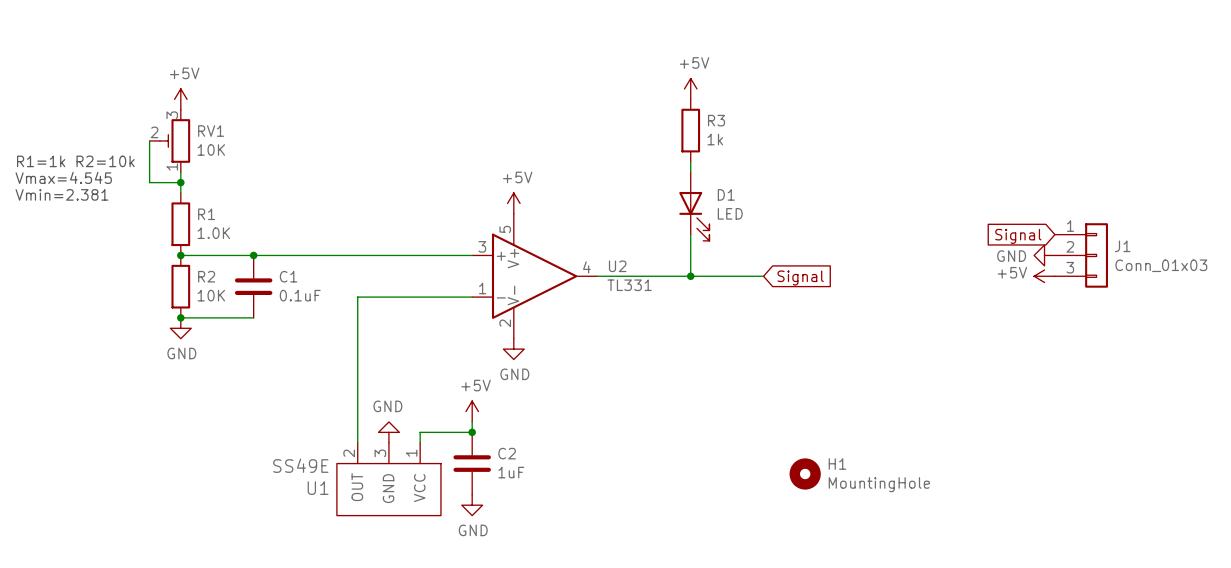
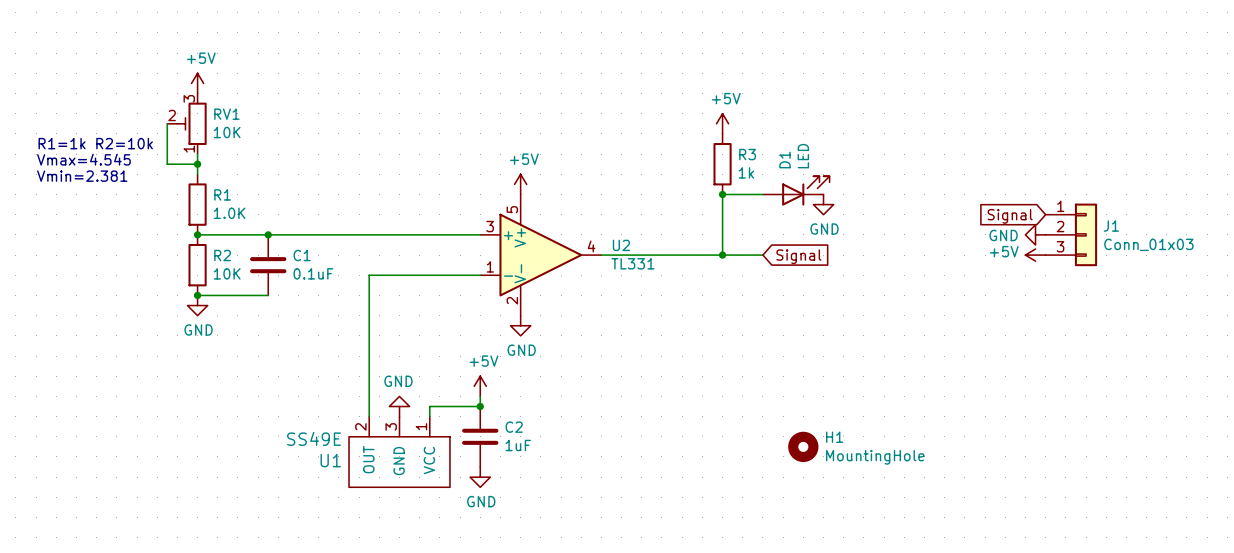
power symbol position: +5V (690, 88) -> +5V (722, 123)
R3 position: (690, 130) -> (722, 164)
wire: (690, 161) (690, 172) -> none
D1 position: (694, 206) -> (796, 190)
junction: none -> (722, 194)
wire: none -> (762, 194) (722, 194) (722, 255)
D1 rotation: 0° (694, 216) -> 90° counterclockwise (805, 190)
power symbol: none -> GND (823, 204)
wire: (690, 234) (690, 276) -> none
junction position: (690, 276) -> (722, 255)

